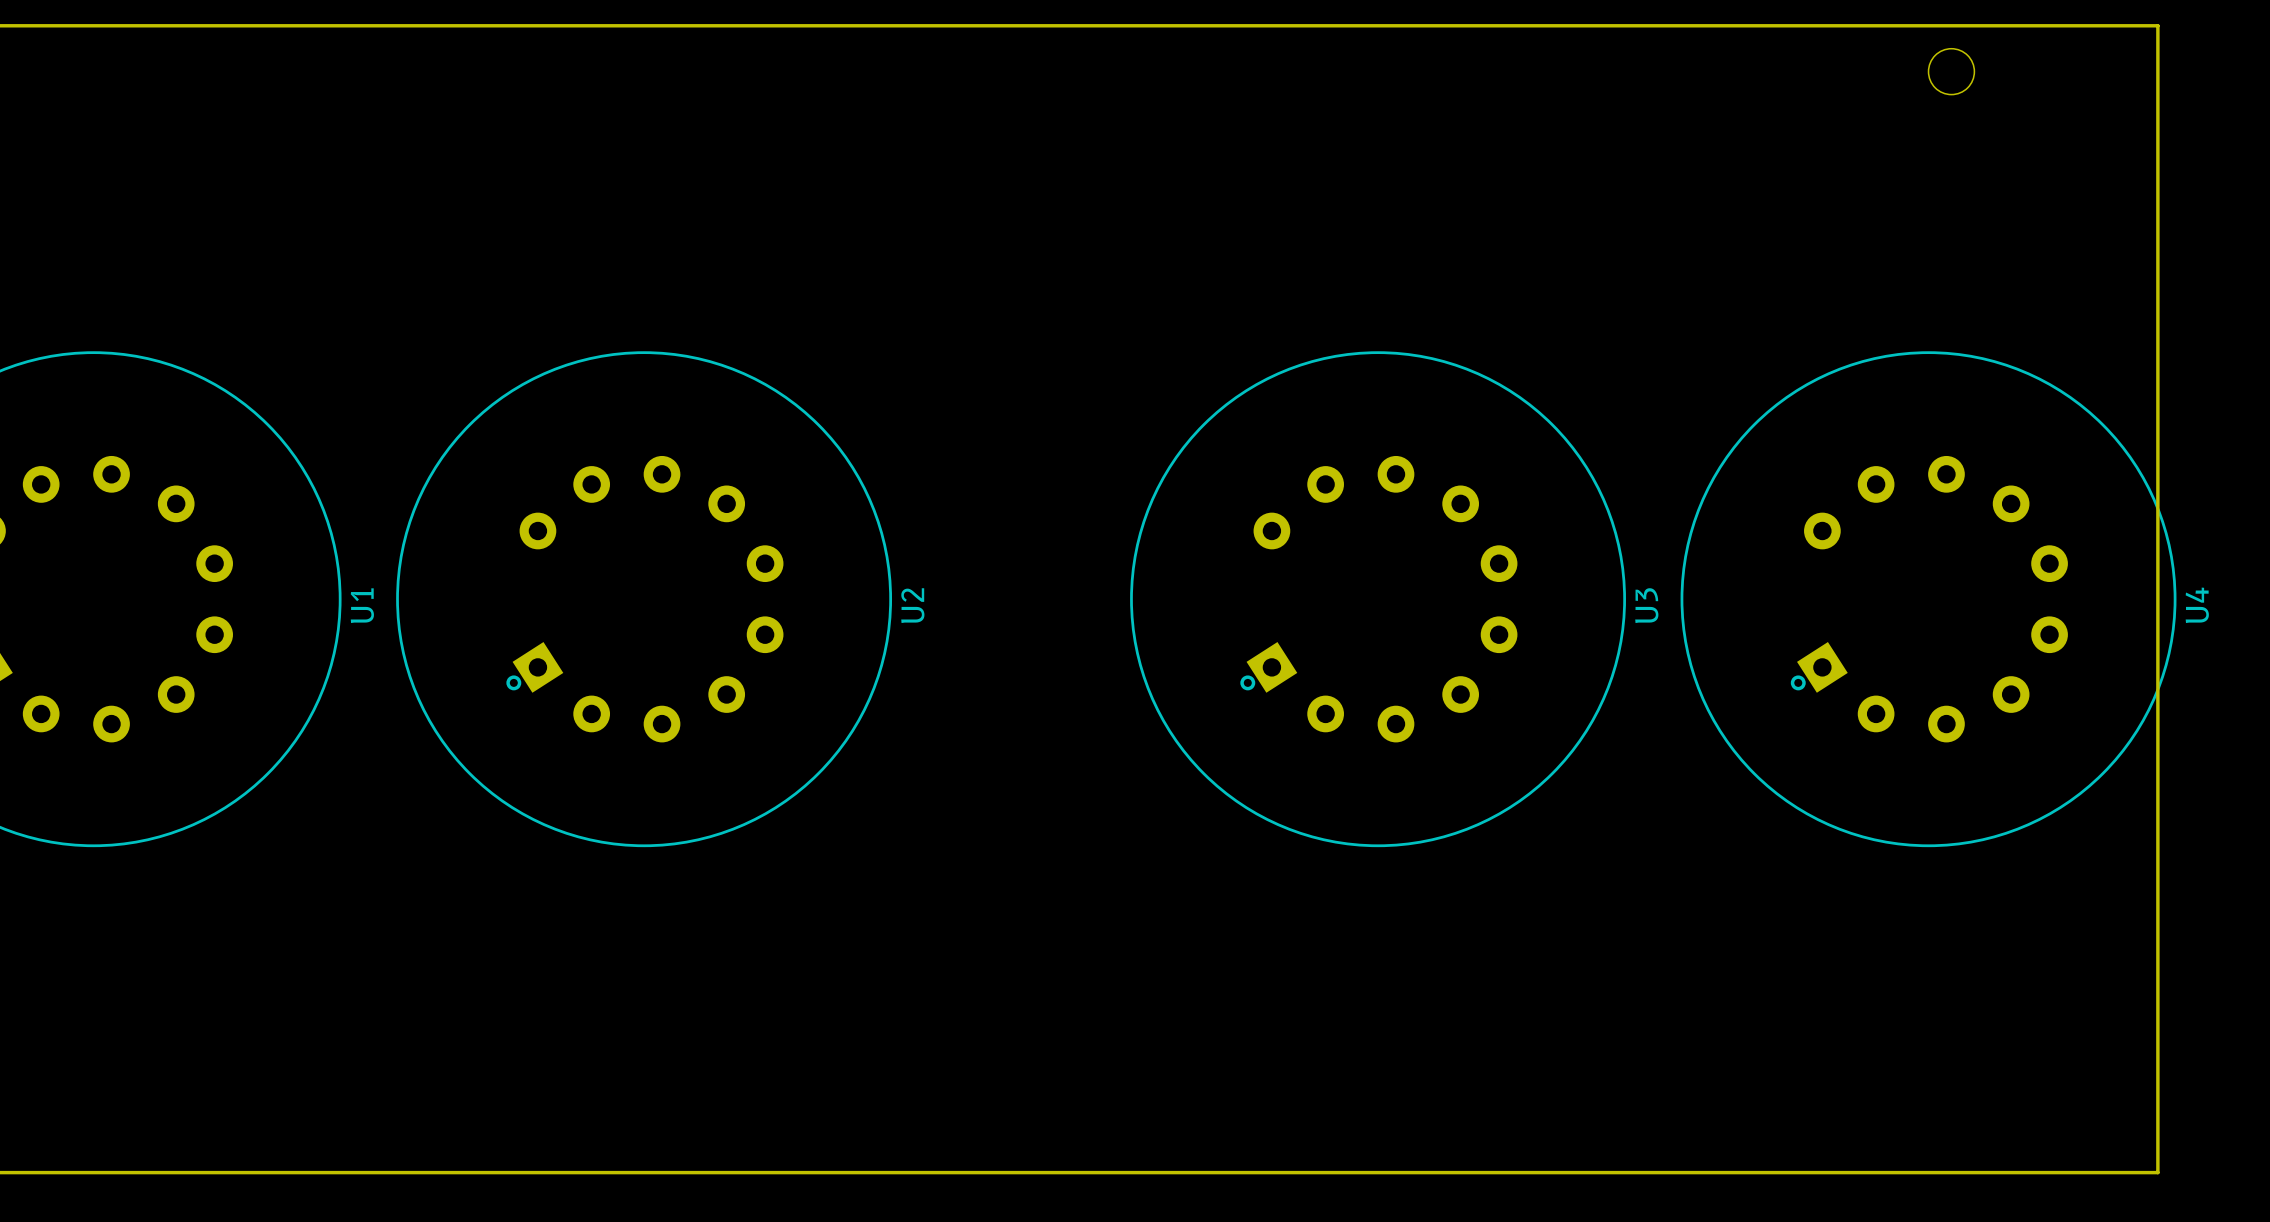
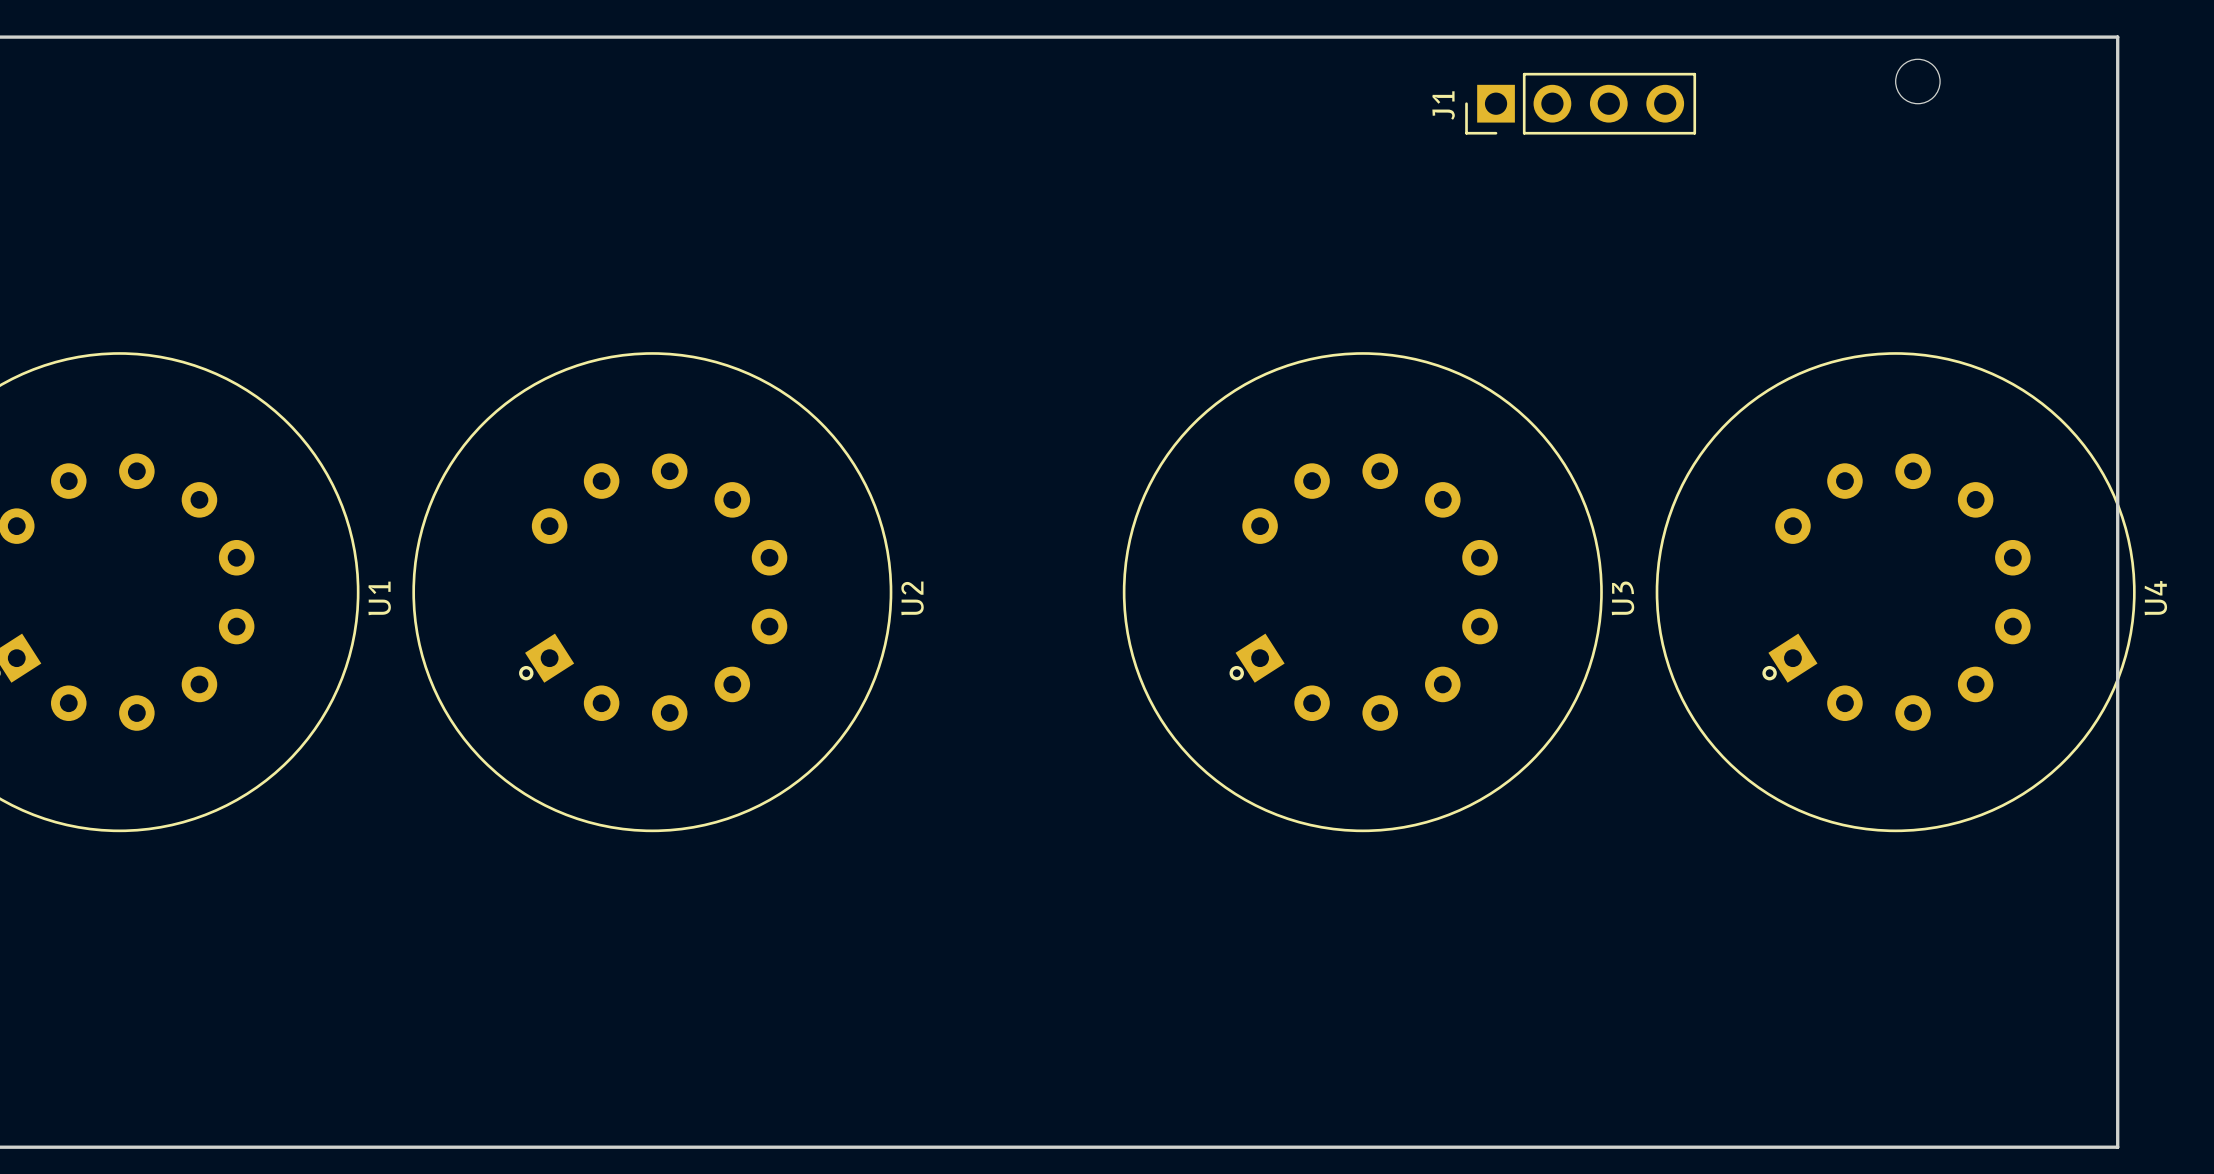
J1: none -> (1580, 103)

